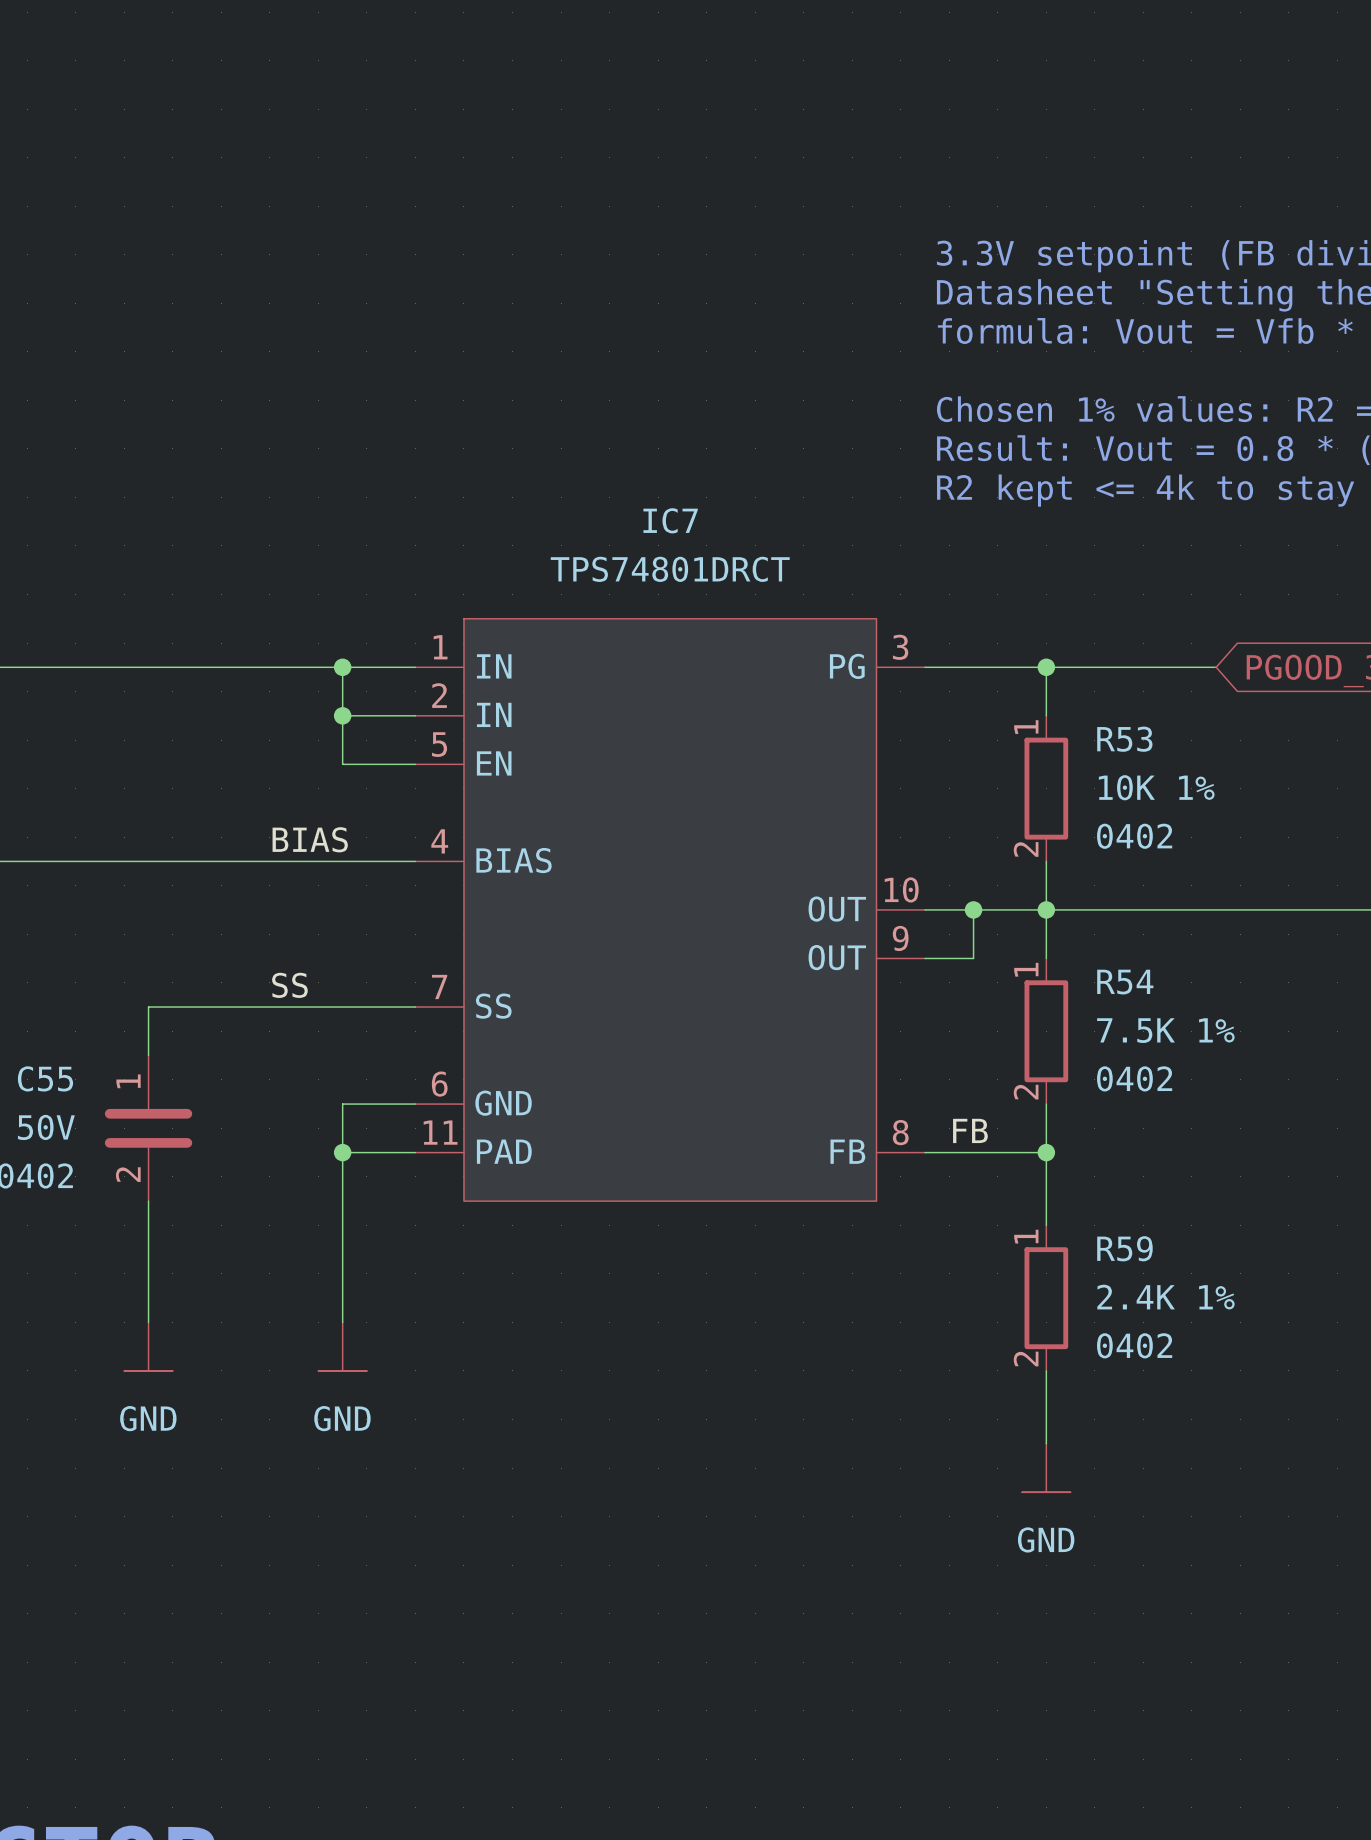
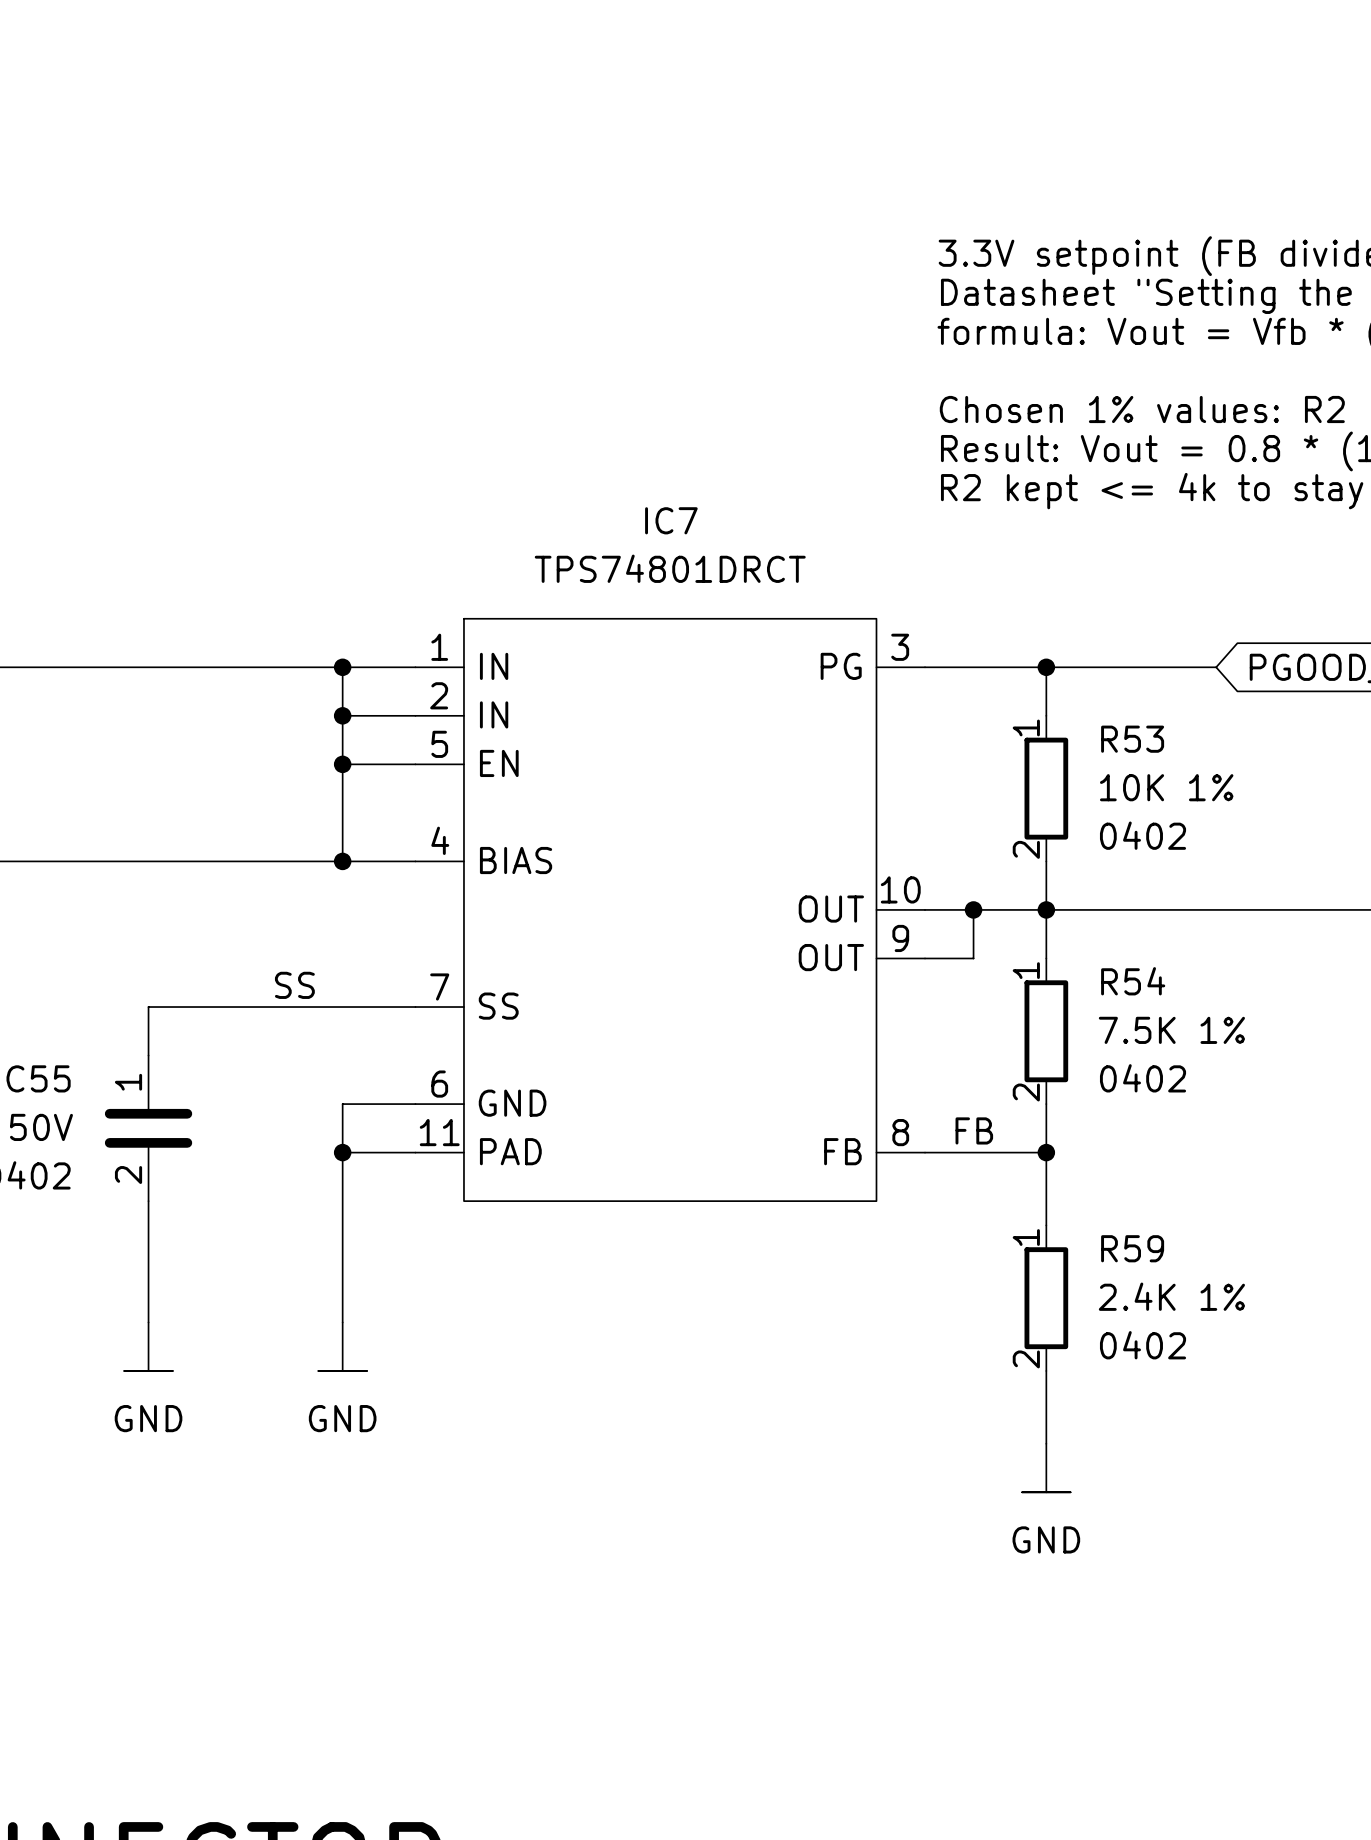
wire: none -> (342, 764) (342, 861)
junction: none -> (342, 764)
label: BIAS (310, 839) -> none
junction: none -> (342, 861)

